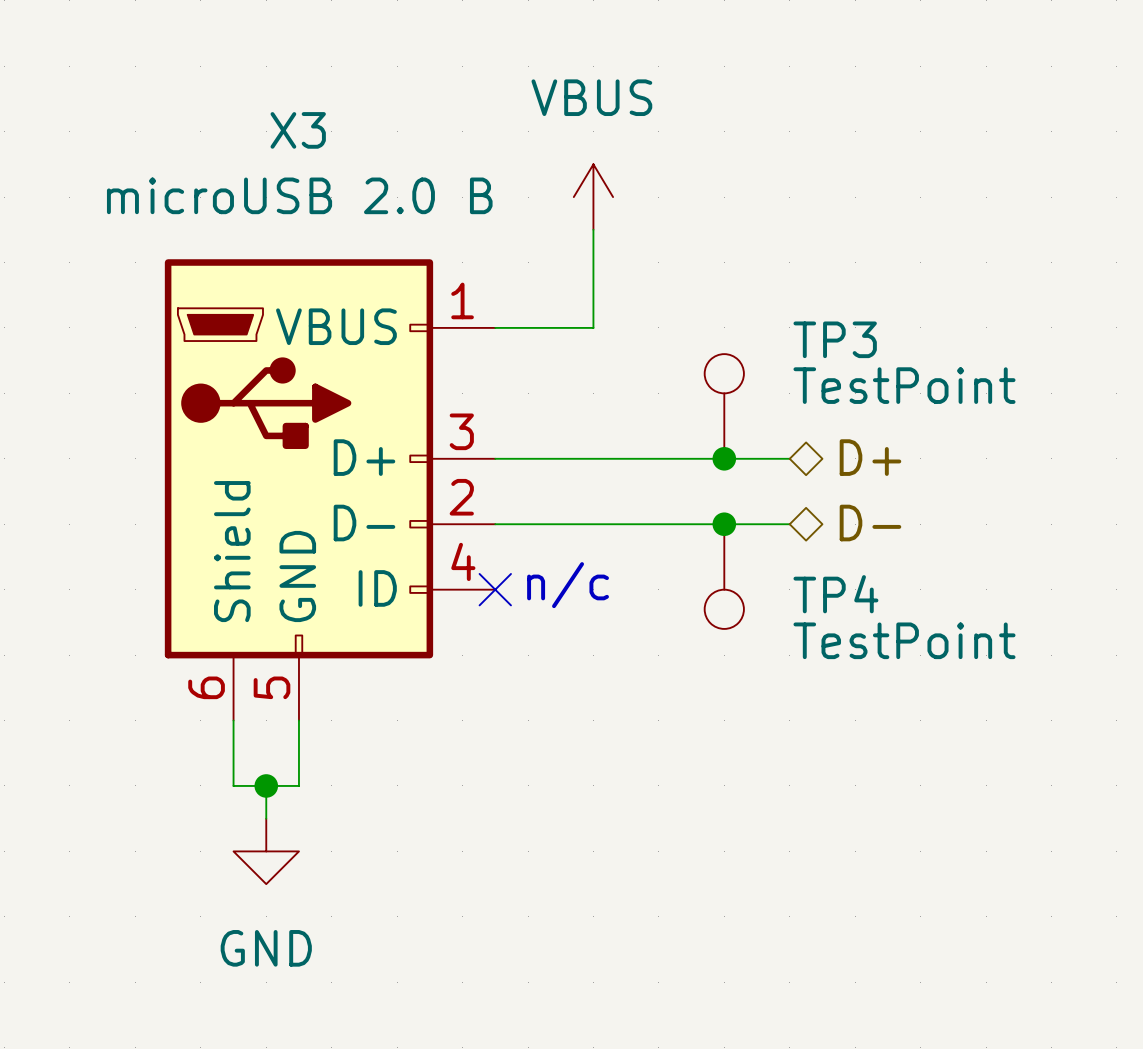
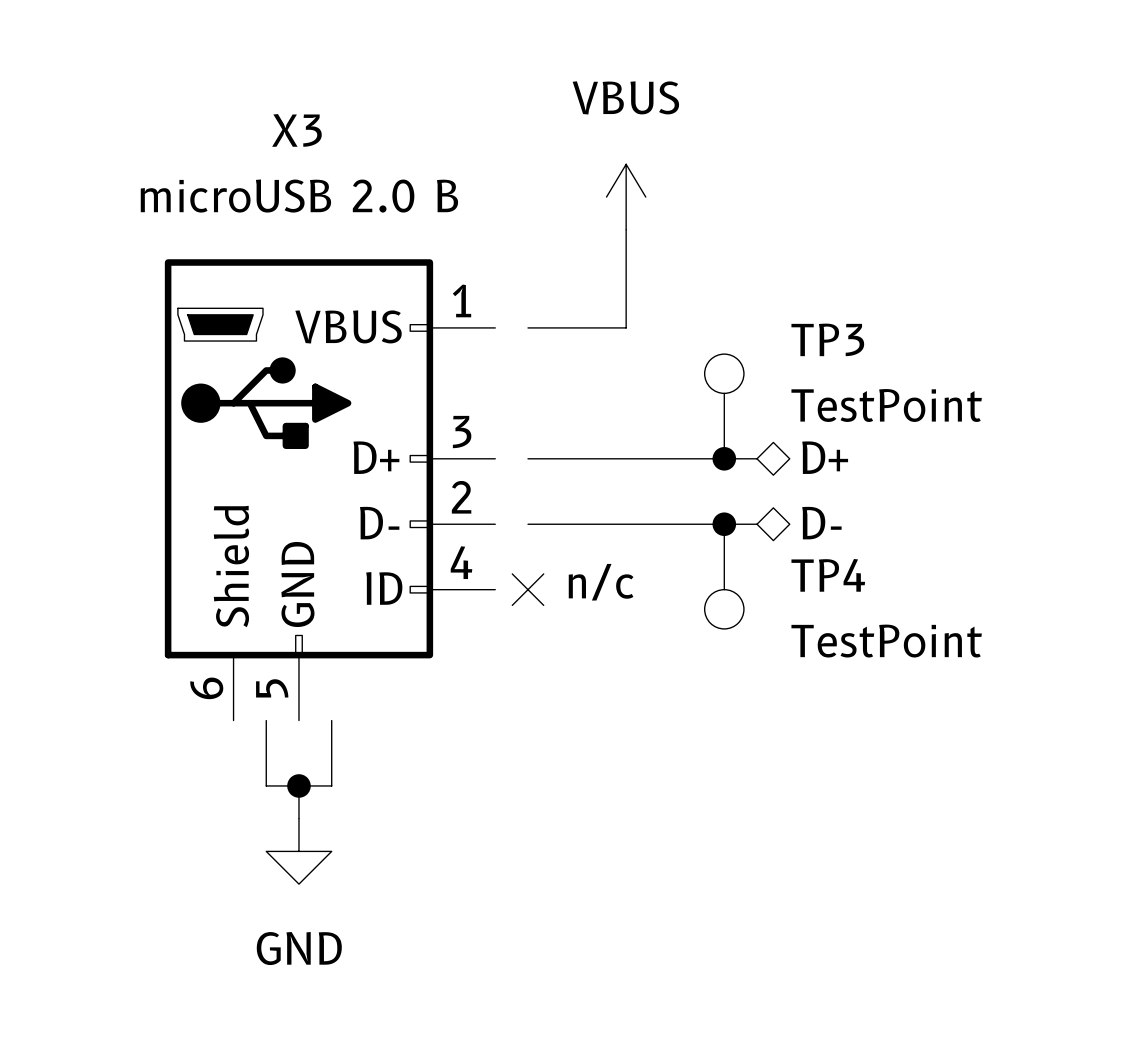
power symbol position: VBUS (593, 197) -> VBUS (626, 197)
wire: (593, 229) (593, 327) -> (626, 229) (626, 327) (593, 327)
wire: (495, 327) (528, 327) -> none
TP3 value position: TestPoint (904, 385) -> TestPoint (886, 405)
hierarchical label position: D+ (870, 457) -> D+ (825, 457)
wire: (495, 458) (528, 458) -> none
wire: (757, 458) (789, 458) -> none
hierarchical label position: D- (870, 523) -> D- (821, 523)
wire: (495, 524) (528, 524) -> none
wire: (757, 524) (789, 524) -> none
text position: n/c (568, 585) -> n/c (601, 582)
no-connect mark position: (495, 589) -> (528, 589)
TP4 name position: TP4 (835, 594) -> TP4 (828, 575)
wire: (233, 720) (233, 785) (266, 785) (266, 818) -> none
wire: (298, 720) (298, 785) -> (266, 720) (266, 785)
wire: none -> (331, 720) (331, 785) (298, 785) (298, 818)
junction position: (266, 785) -> (298, 785)
power symbol position: GND (266, 851) -> GND (298, 851)

